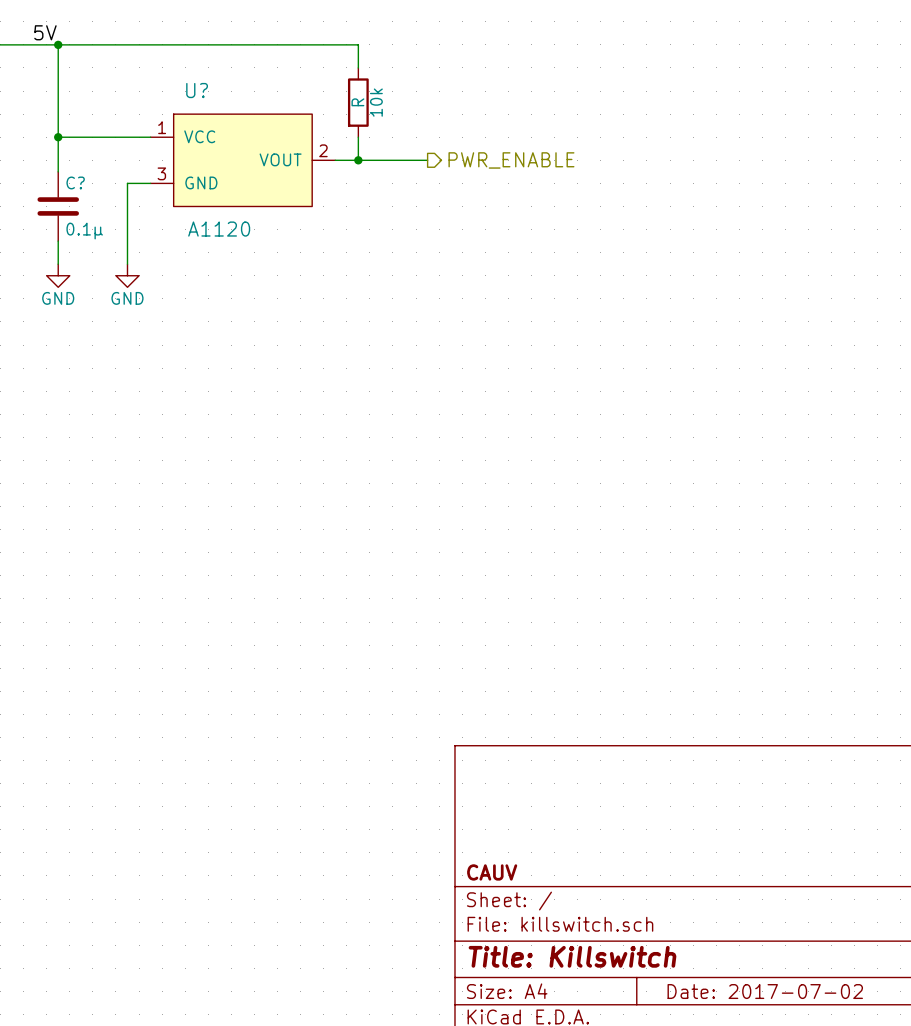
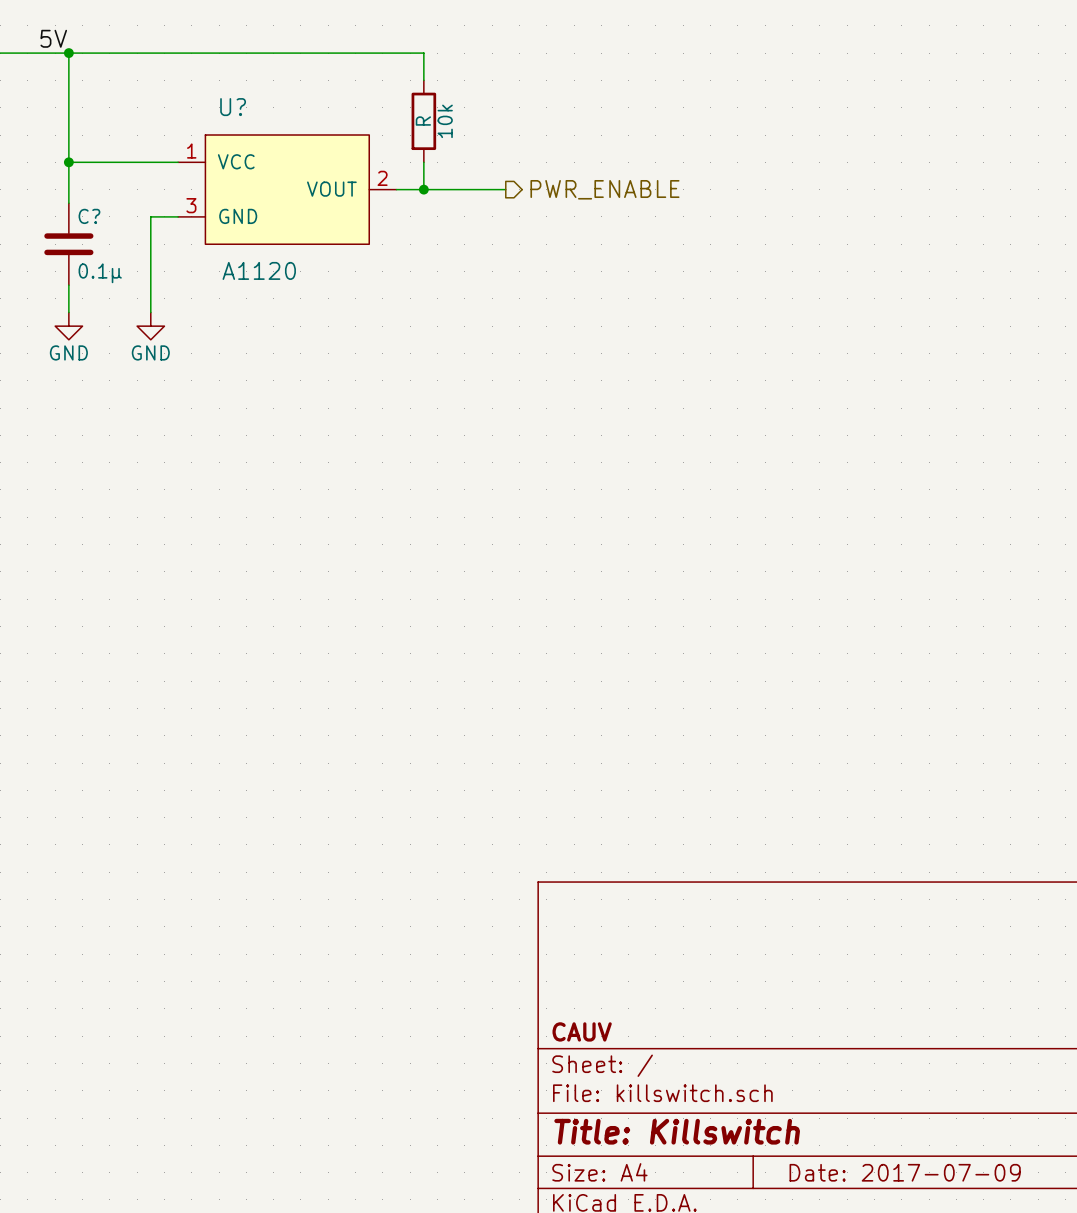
title block: Date: 2017-07-02 (765, 991) -> Date: 2017-07-09 (905, 1172)

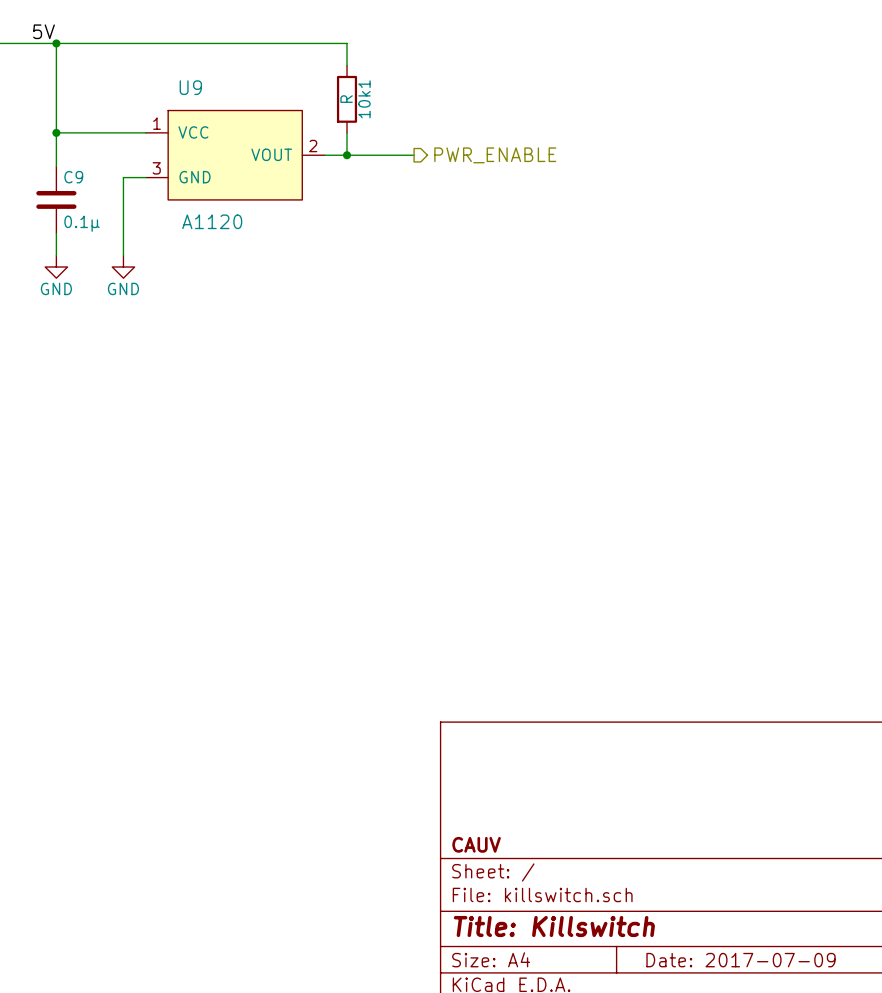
U? name: U? (233, 107) -> U9 (190, 87)
10k name: 10k (445, 121) -> 10k1 (364, 99)
C? name: C? (89, 216) -> C9 (73, 177)

